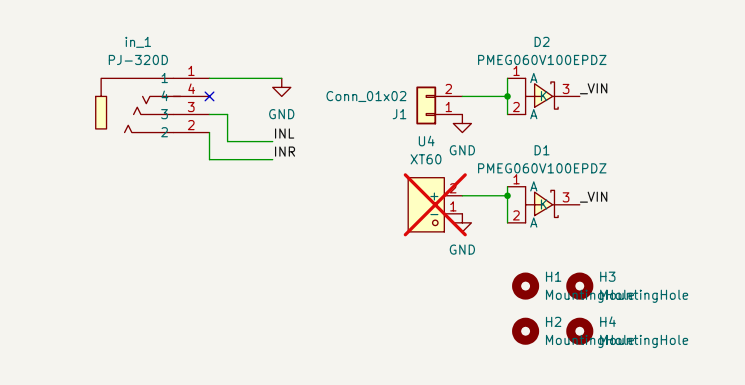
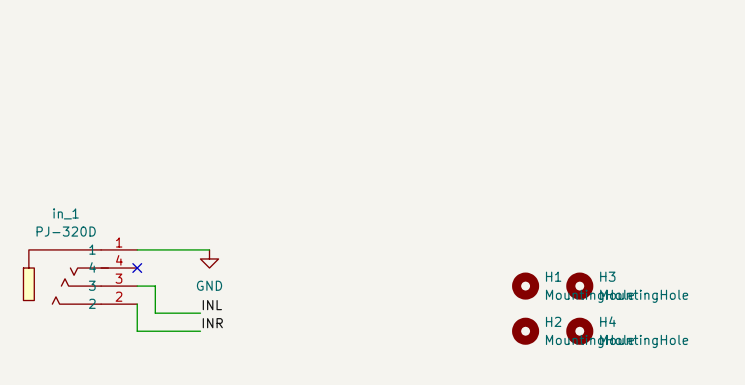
wire: (209, 78) (281, 78) -> none
wire: (507, 78) (507, 114) -> none
power symbol: GND (281, 87) -> none
label: _VIN (593, 88) -> none
no-connect mark: (209, 96) -> none
wire: (462, 96) (507, 96) -> none
junction: (507, 96) -> none
D2: PMEG060V100EPDZ (543, 96) -> none
in_1 position: (152, 105) -> (80, 277)
J1: Conn_01x02 (439, 105) -> none
wire: (209, 114) (227, 114) (227, 141) (272, 141) -> none
power symbol: GND (462, 123) -> none
wire: (209, 132) (209, 159) (272, 159) -> none
label: INL (284, 133) -> none
label: INR (285, 151) -> none
wire: (507, 186) (507, 222) -> none
wire: (462, 195) (507, 195) -> none
junction: (507, 195) -> none
label: _VIN (593, 197) -> none
U4: XT60 (435, 204) -> none
D1: PMEG060V100EPDZ (543, 204) -> none
power symbol: GND (462, 222) -> none
wire: none -> (137, 249) (209, 249)
power symbol: none -> GND (209, 258)
no-connect mark: none -> (137, 268)
wire: none -> (137, 286) (155, 286) (155, 313) (200, 313)
wire: none -> (137, 304) (137, 331) (200, 331)
label: none -> INL (212, 305)
label: none -> INR (212, 323)

